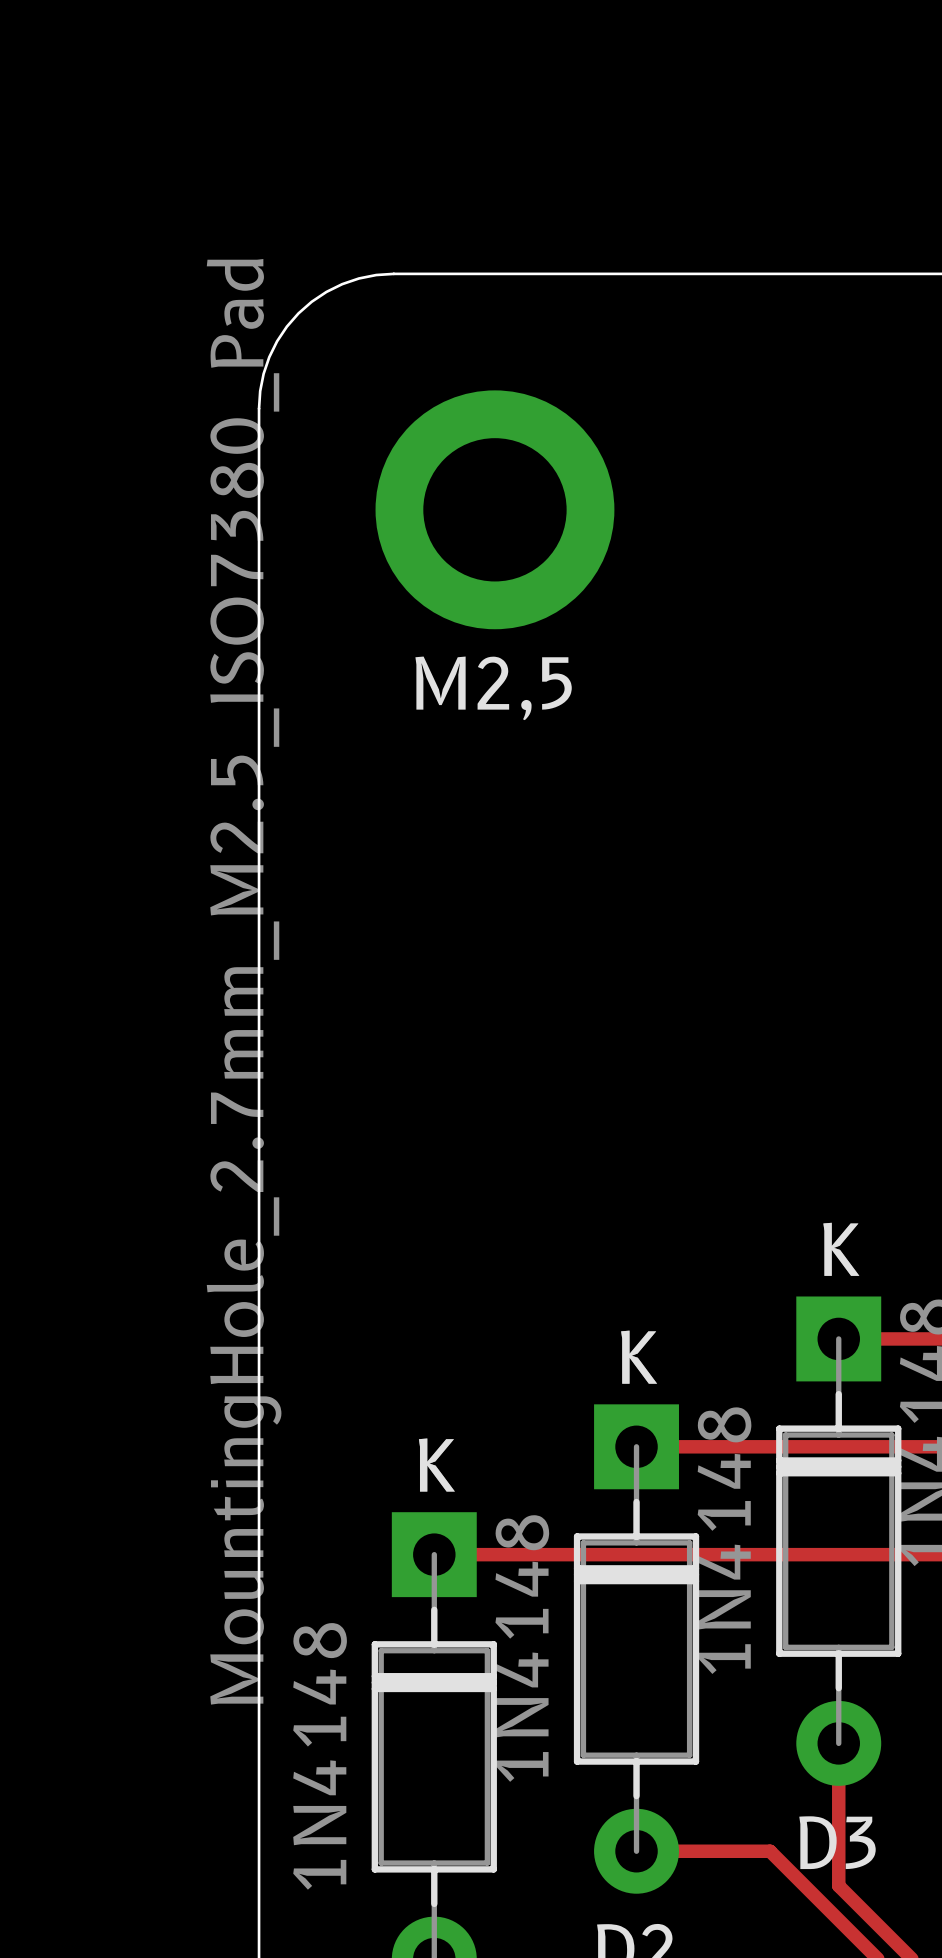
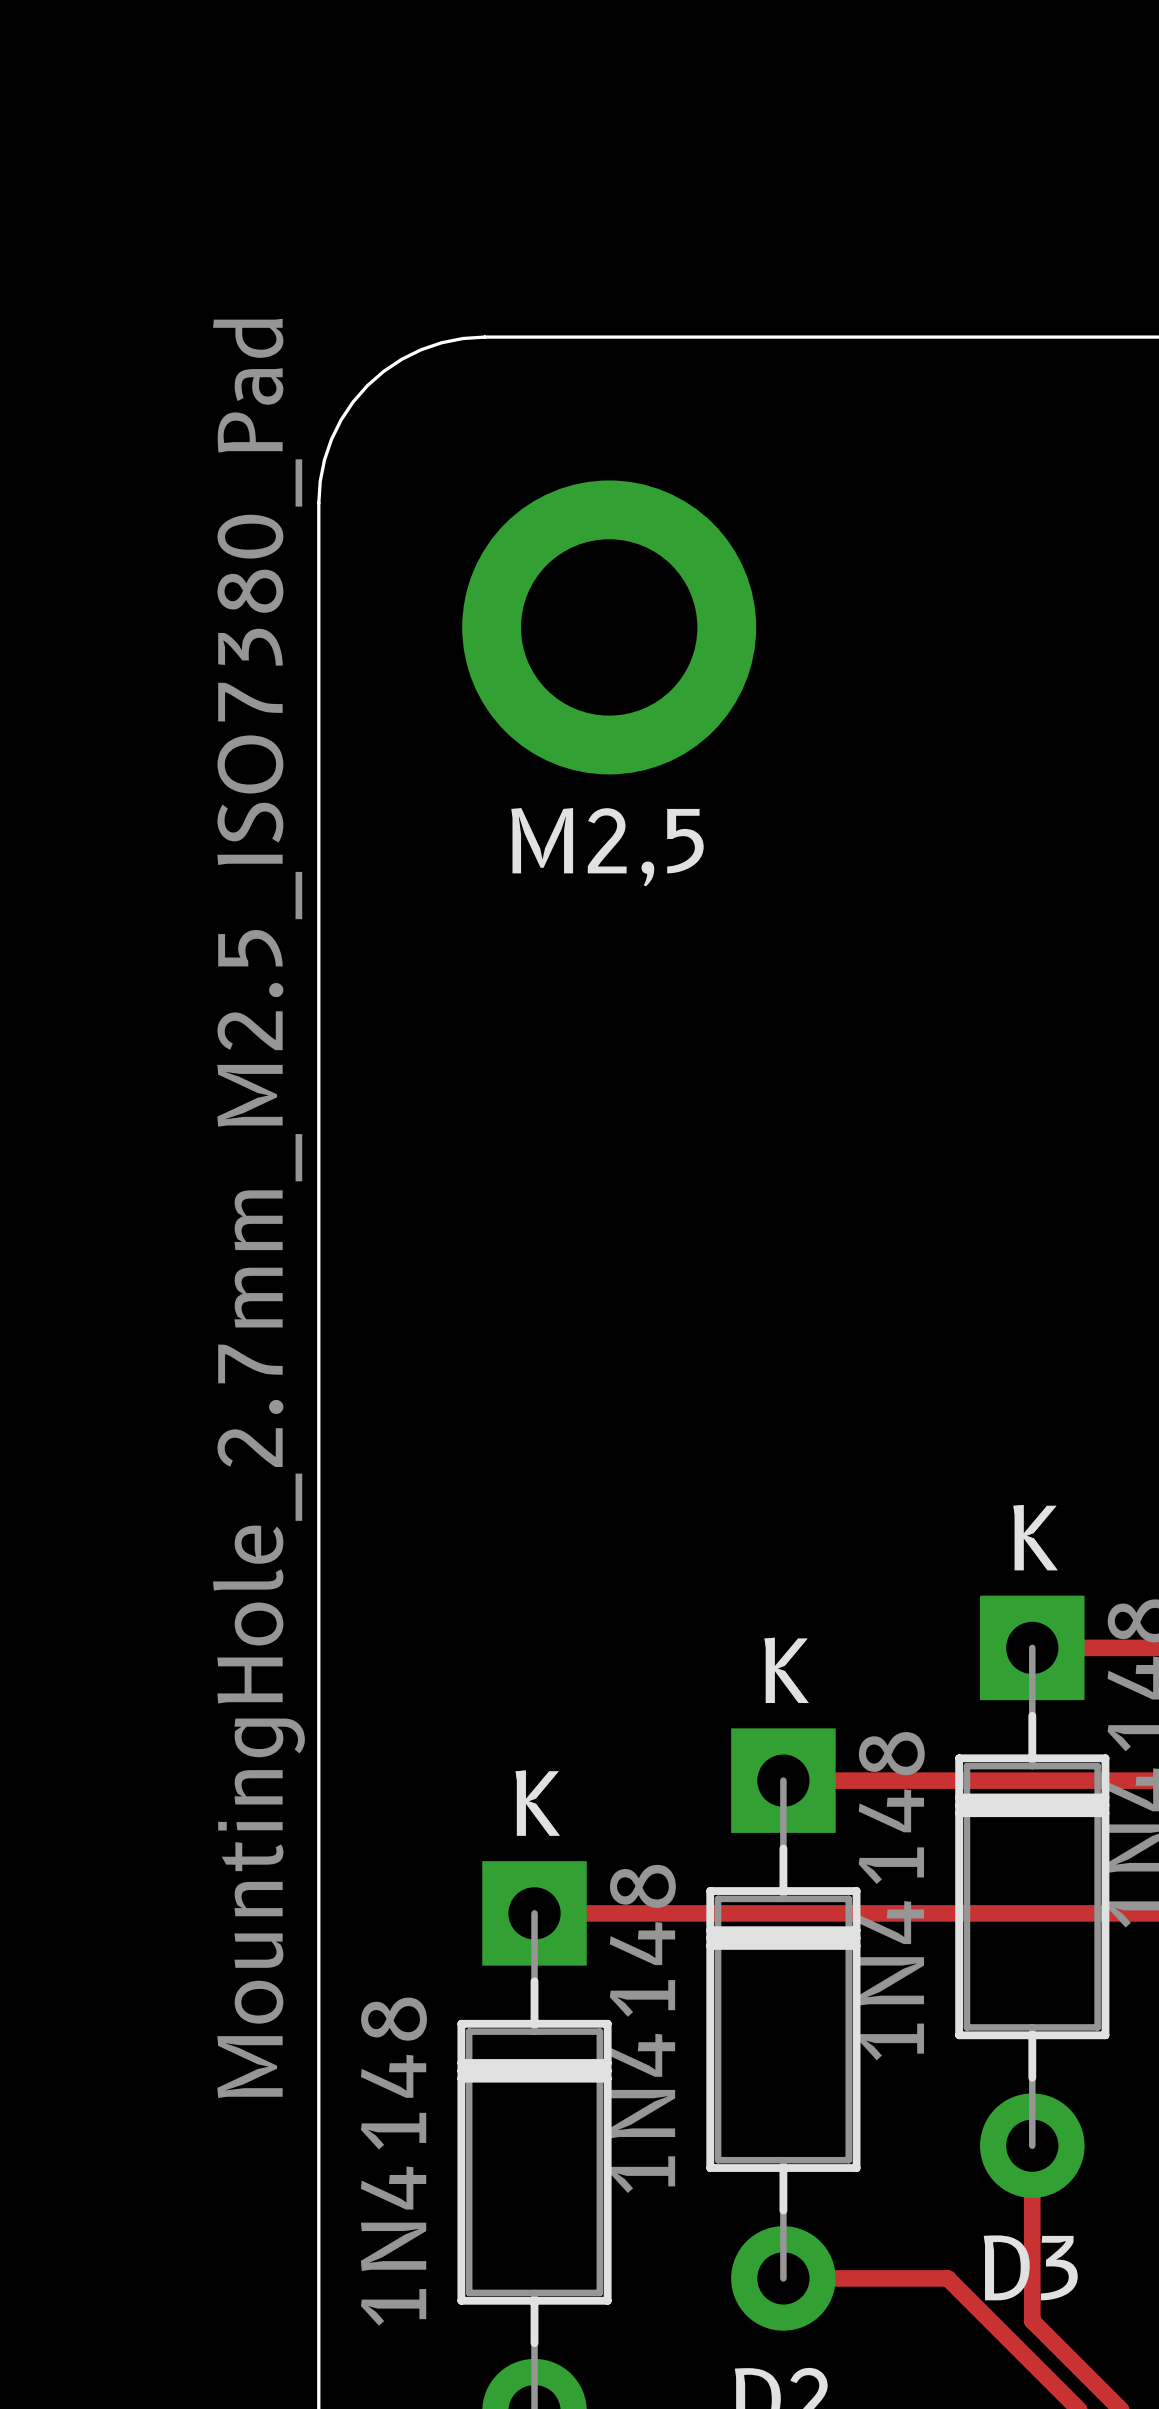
M2,5 value position: MountingHole_2.7mm_M2.5_ISO7380_Pad (244, 981) -> MountingHole_2.7mm_M2.5_ISO7380_Pad (258, 1208)

